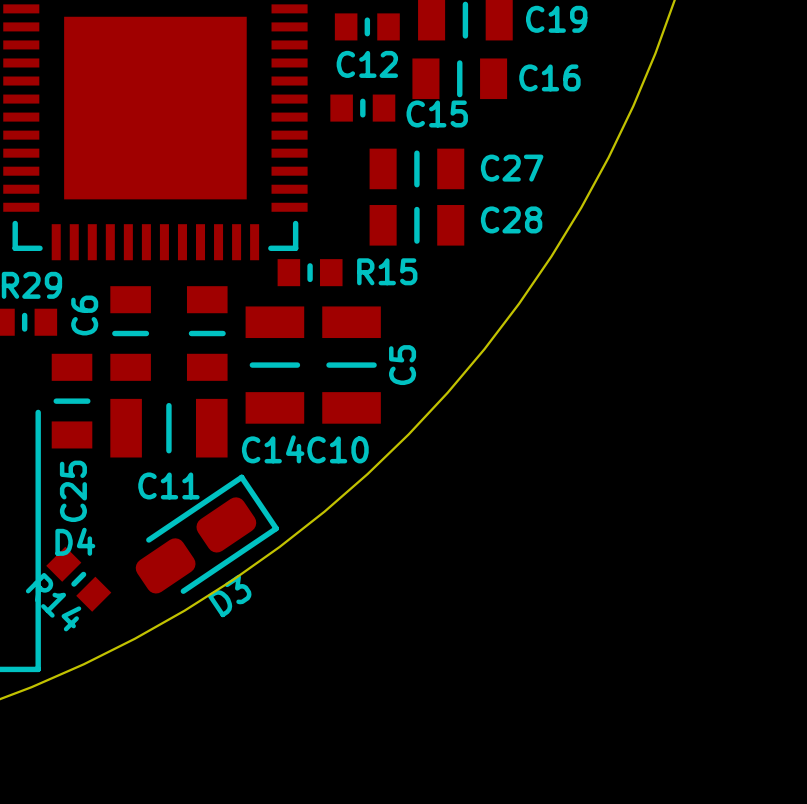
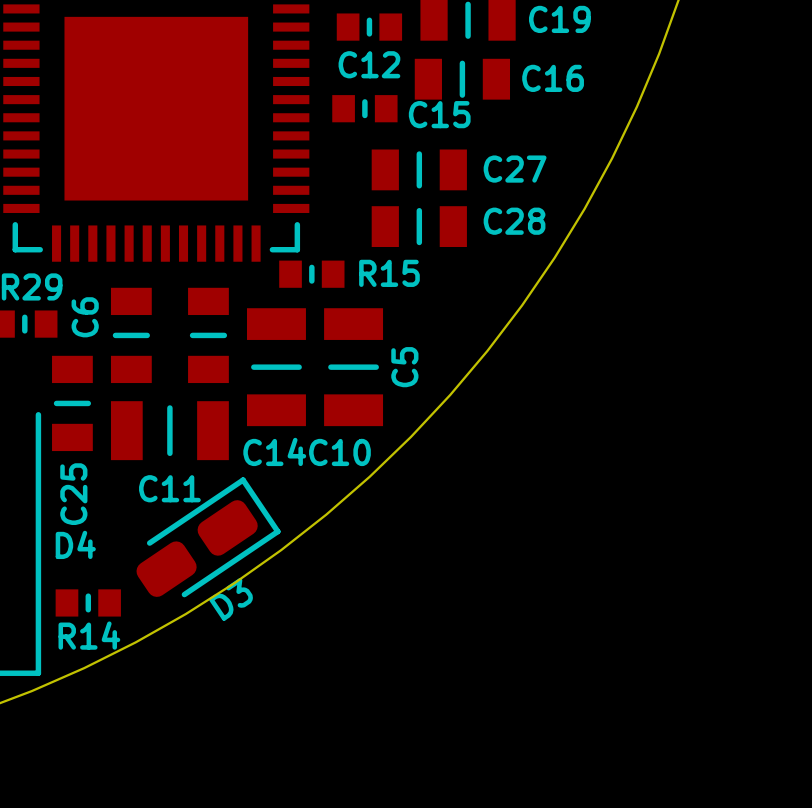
R14 rotation: 0° (78, 579) -> 45° counterclockwise (88, 602)

